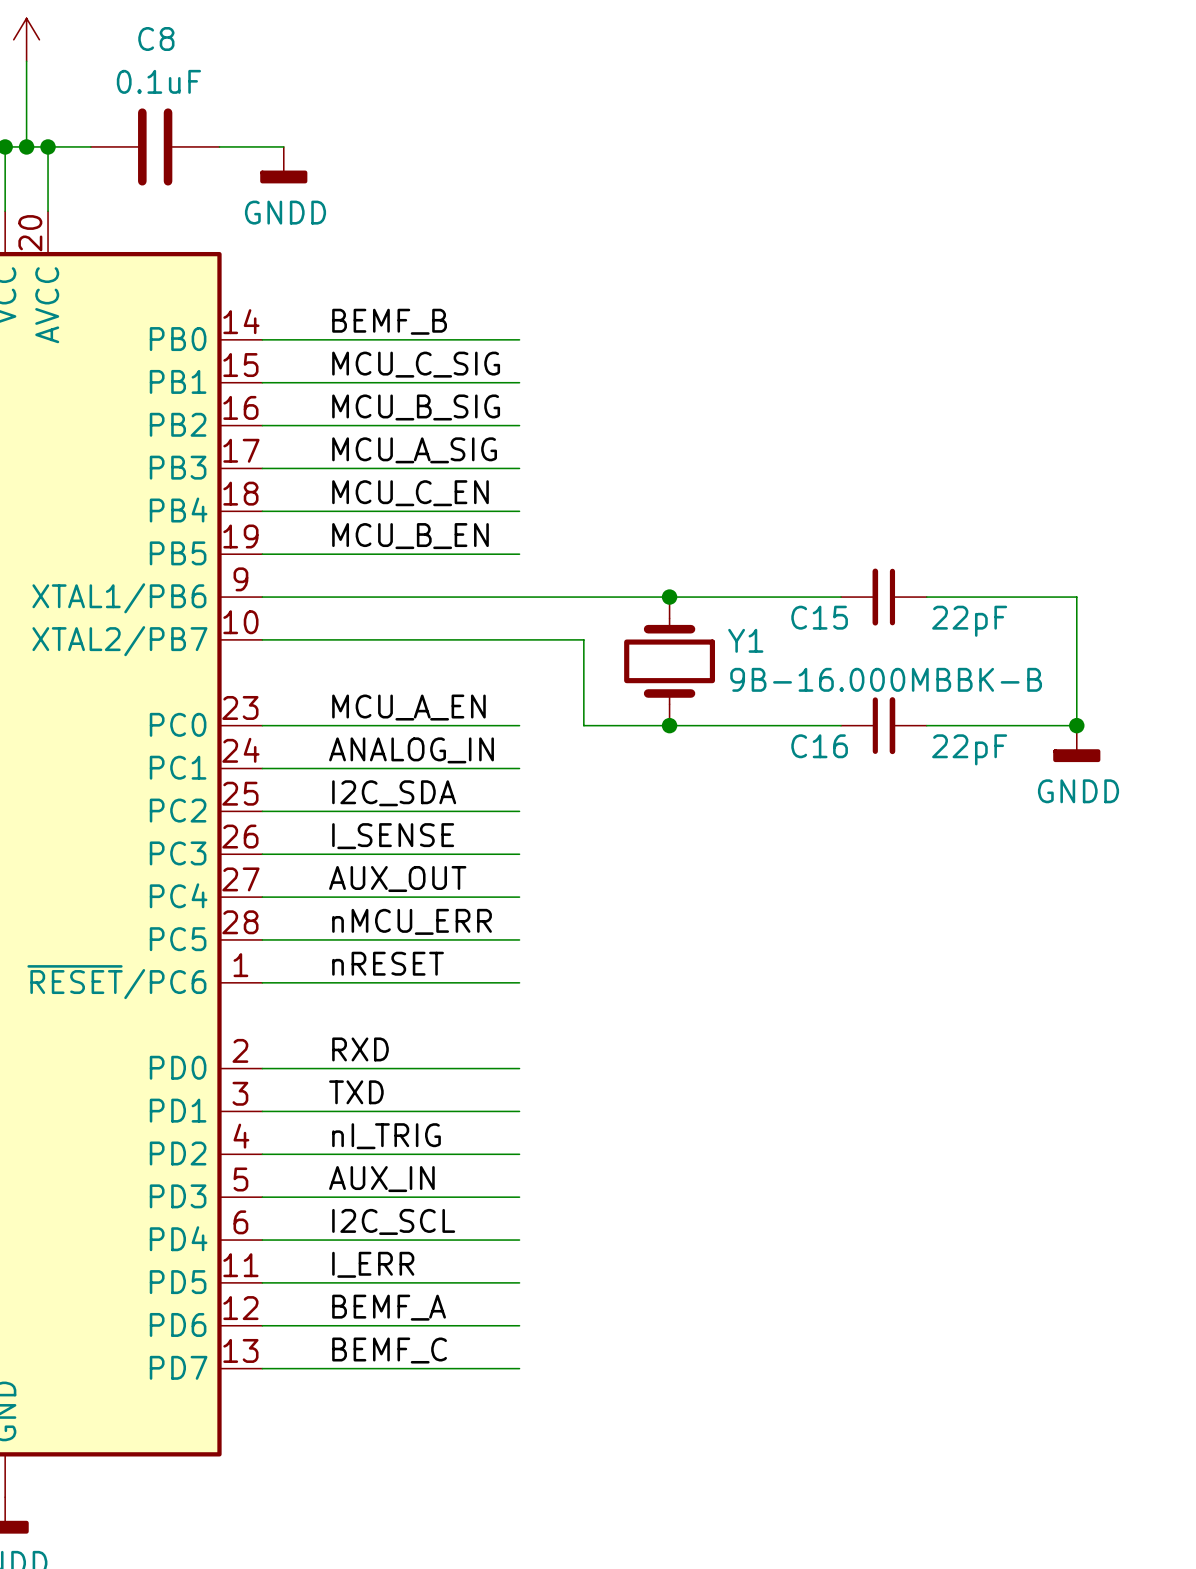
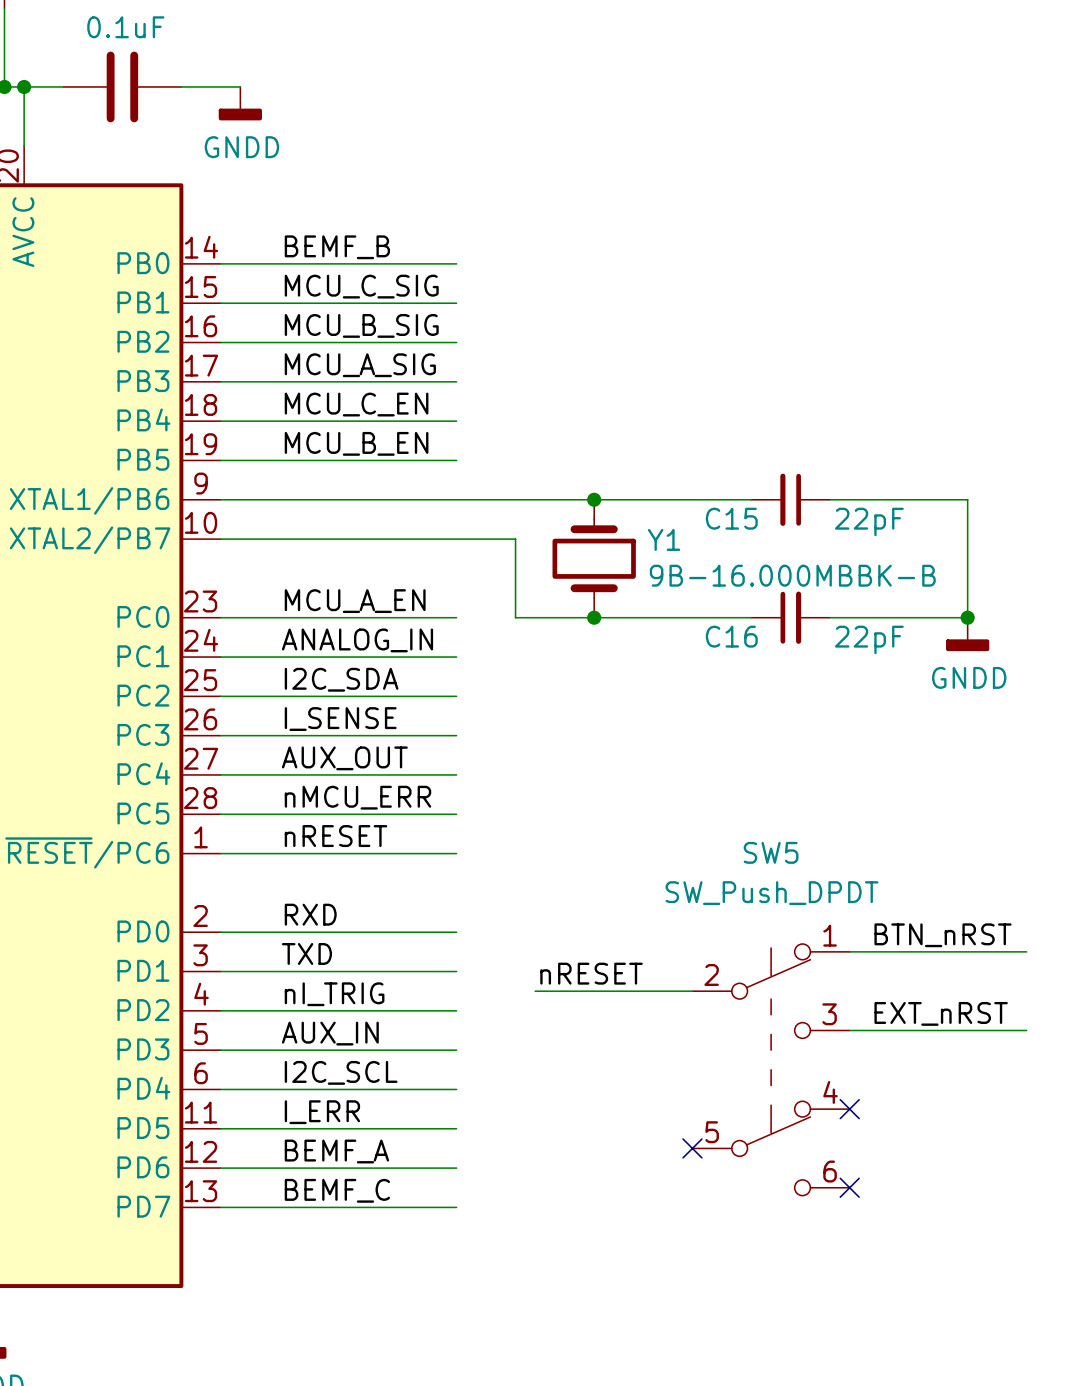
label: none -> BTN_nRST (943, 935)
wire: none -> (849, 951) (1026, 951)
label: none -> nRESET (591, 973)
wire: none -> (535, 991) (692, 991)
label: none -> EXT_nRST (941, 1013)
wire: none -> (849, 1030) (1026, 1030)
SW5: none -> SW_Push_DPDT (771, 1069)
no-connect mark: none -> (849, 1109)
no-connect mark: none -> (692, 1148)
no-connect mark: none -> (849, 1187)

